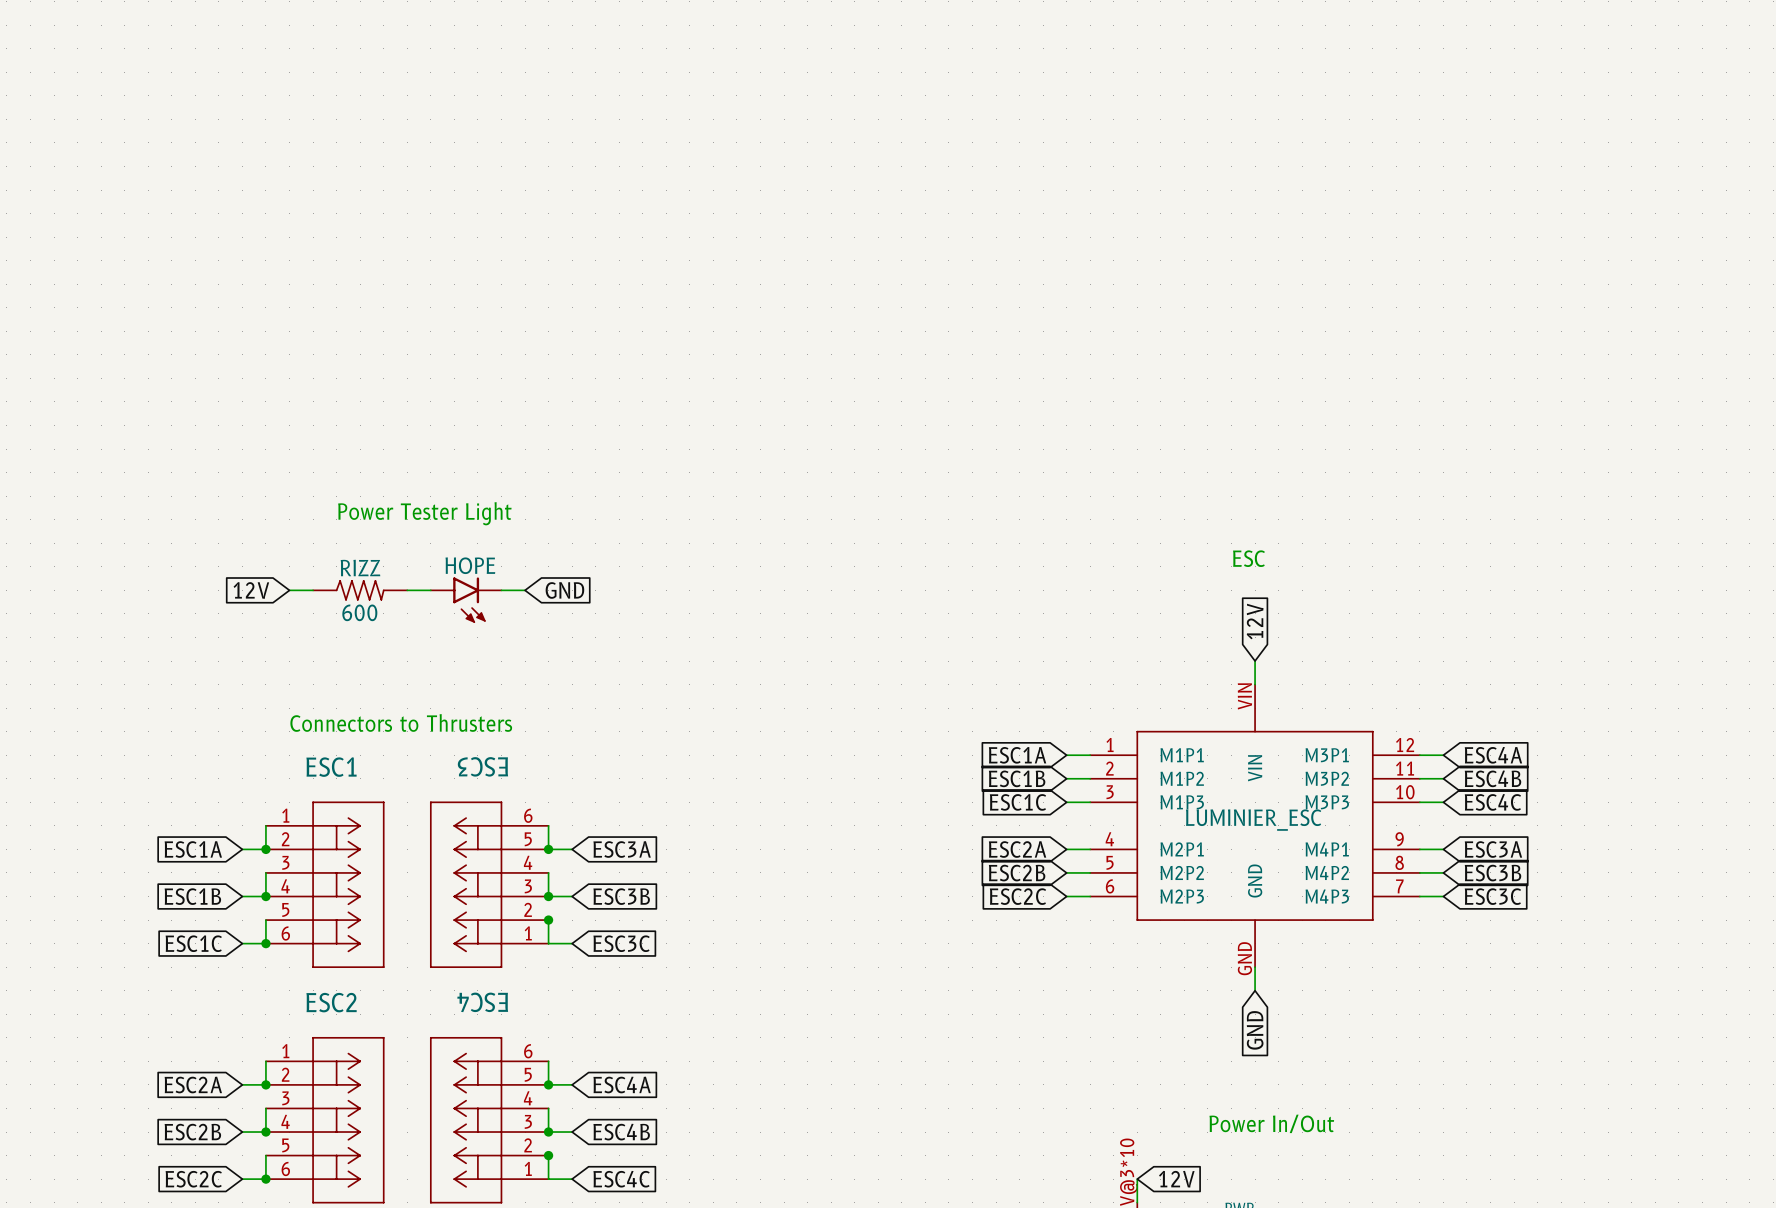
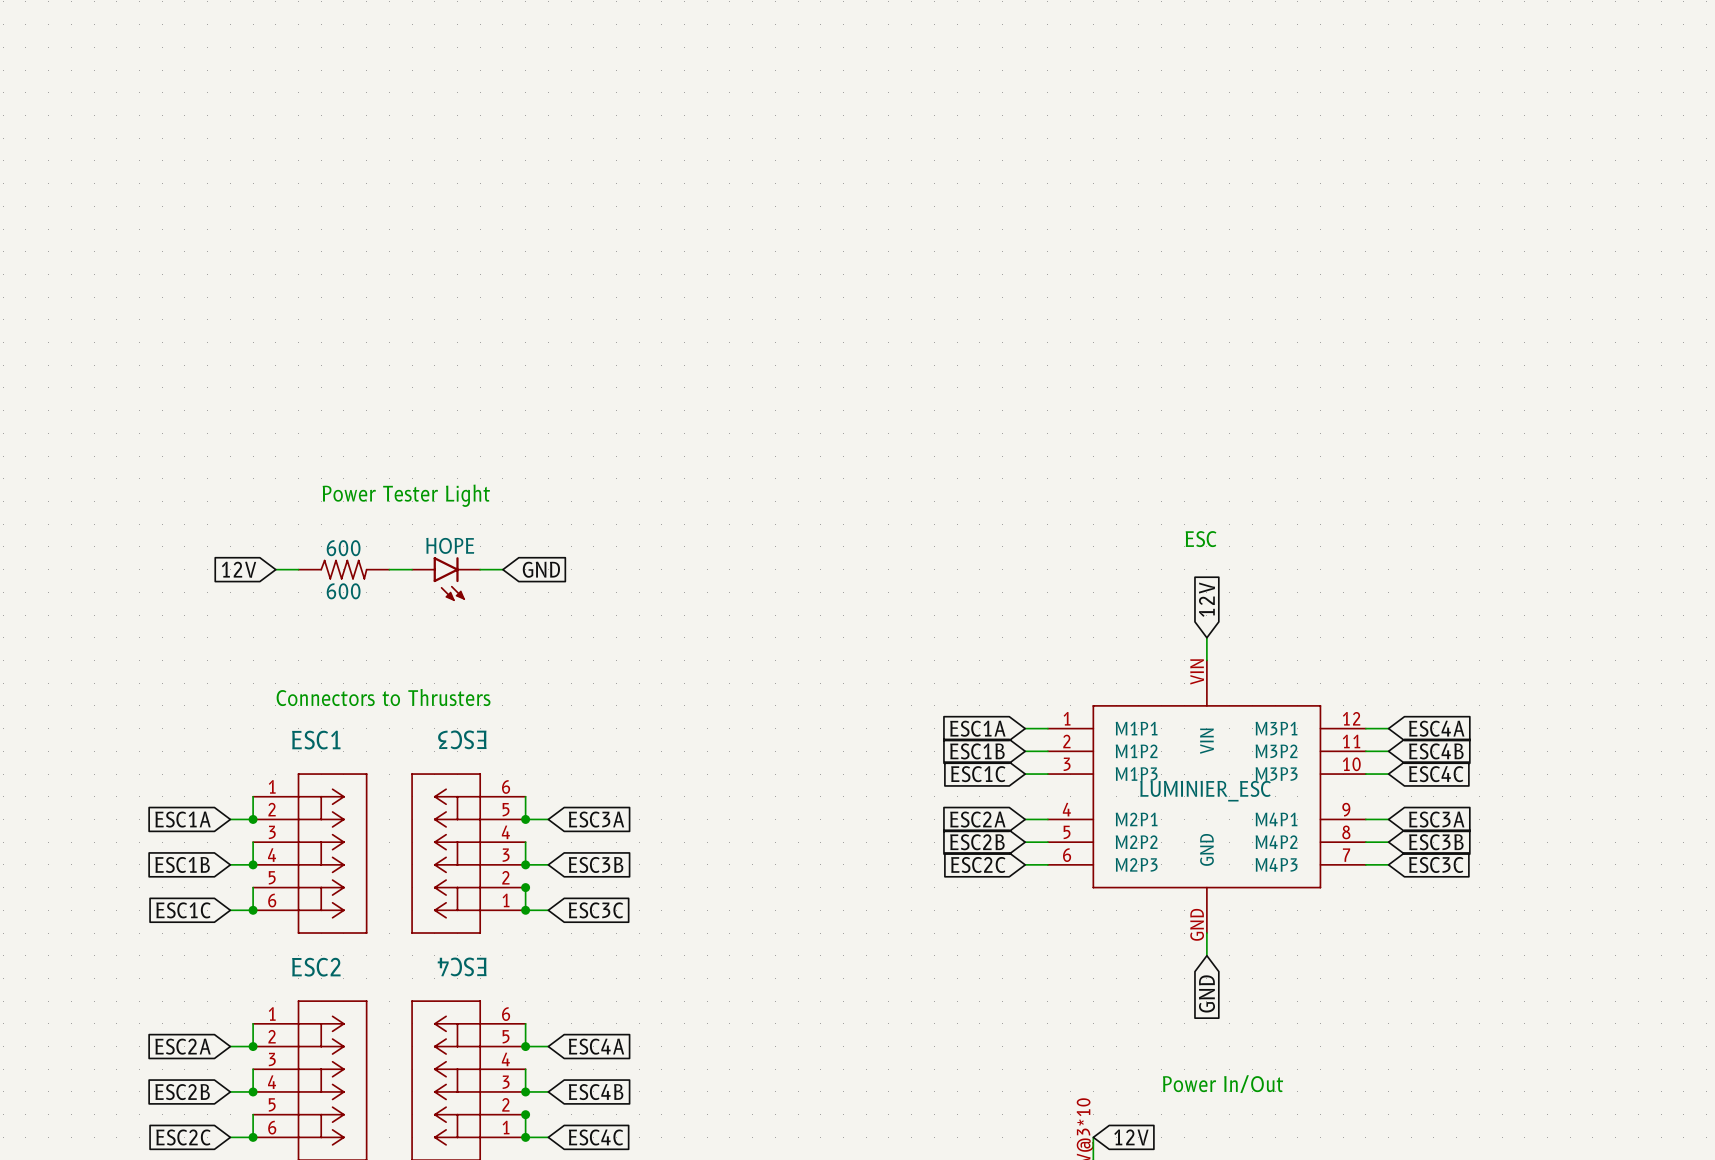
RIZZ name: RIZZ (360, 567) -> 600 (343, 548)
junction: none -> (525, 910)
junction: none -> (525, 1137)

